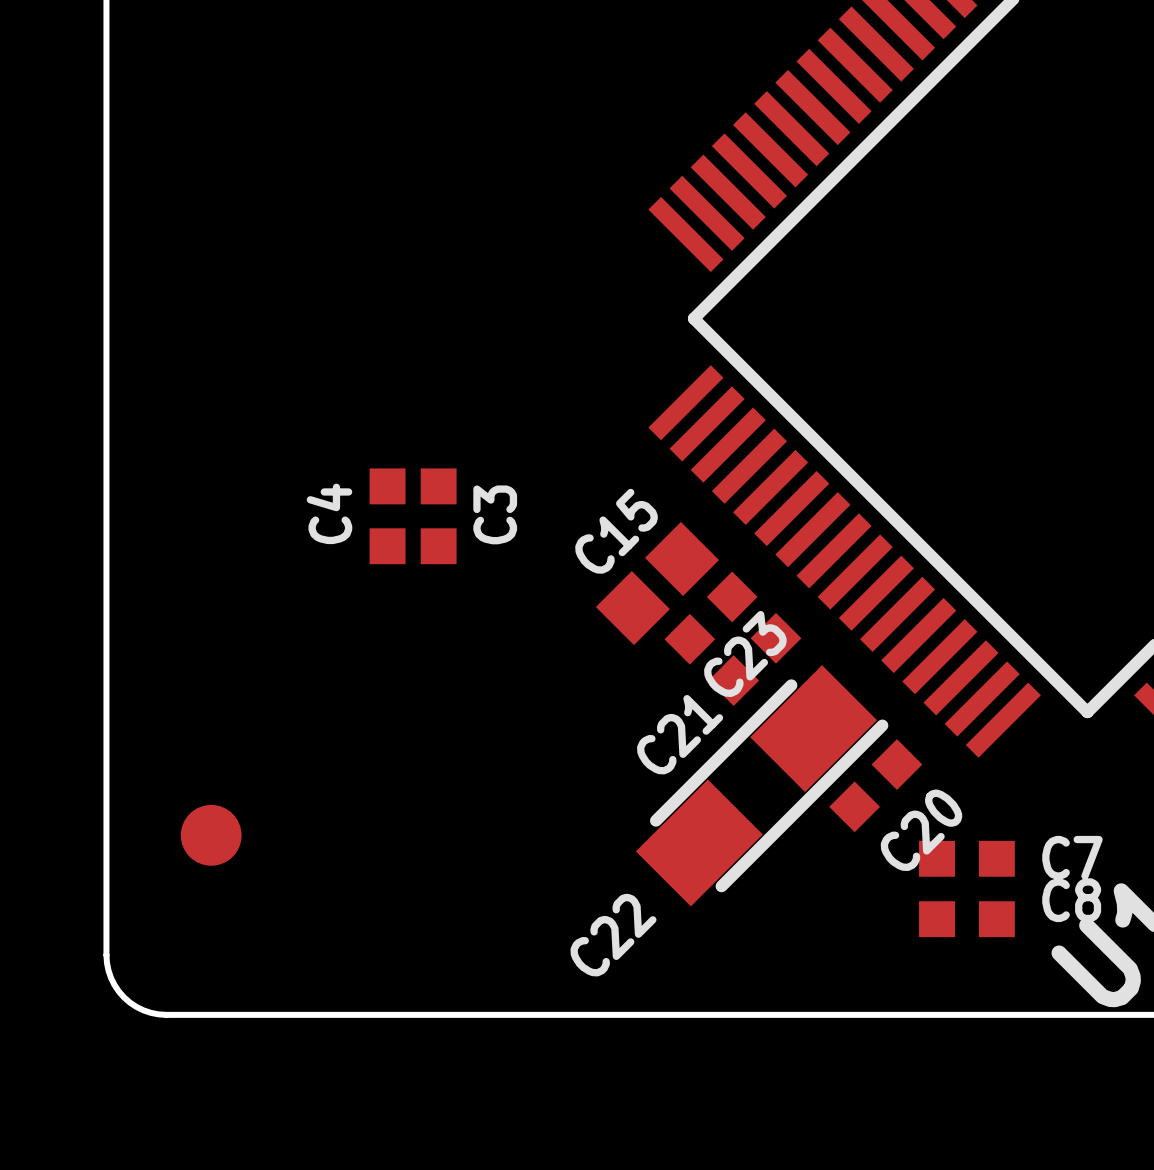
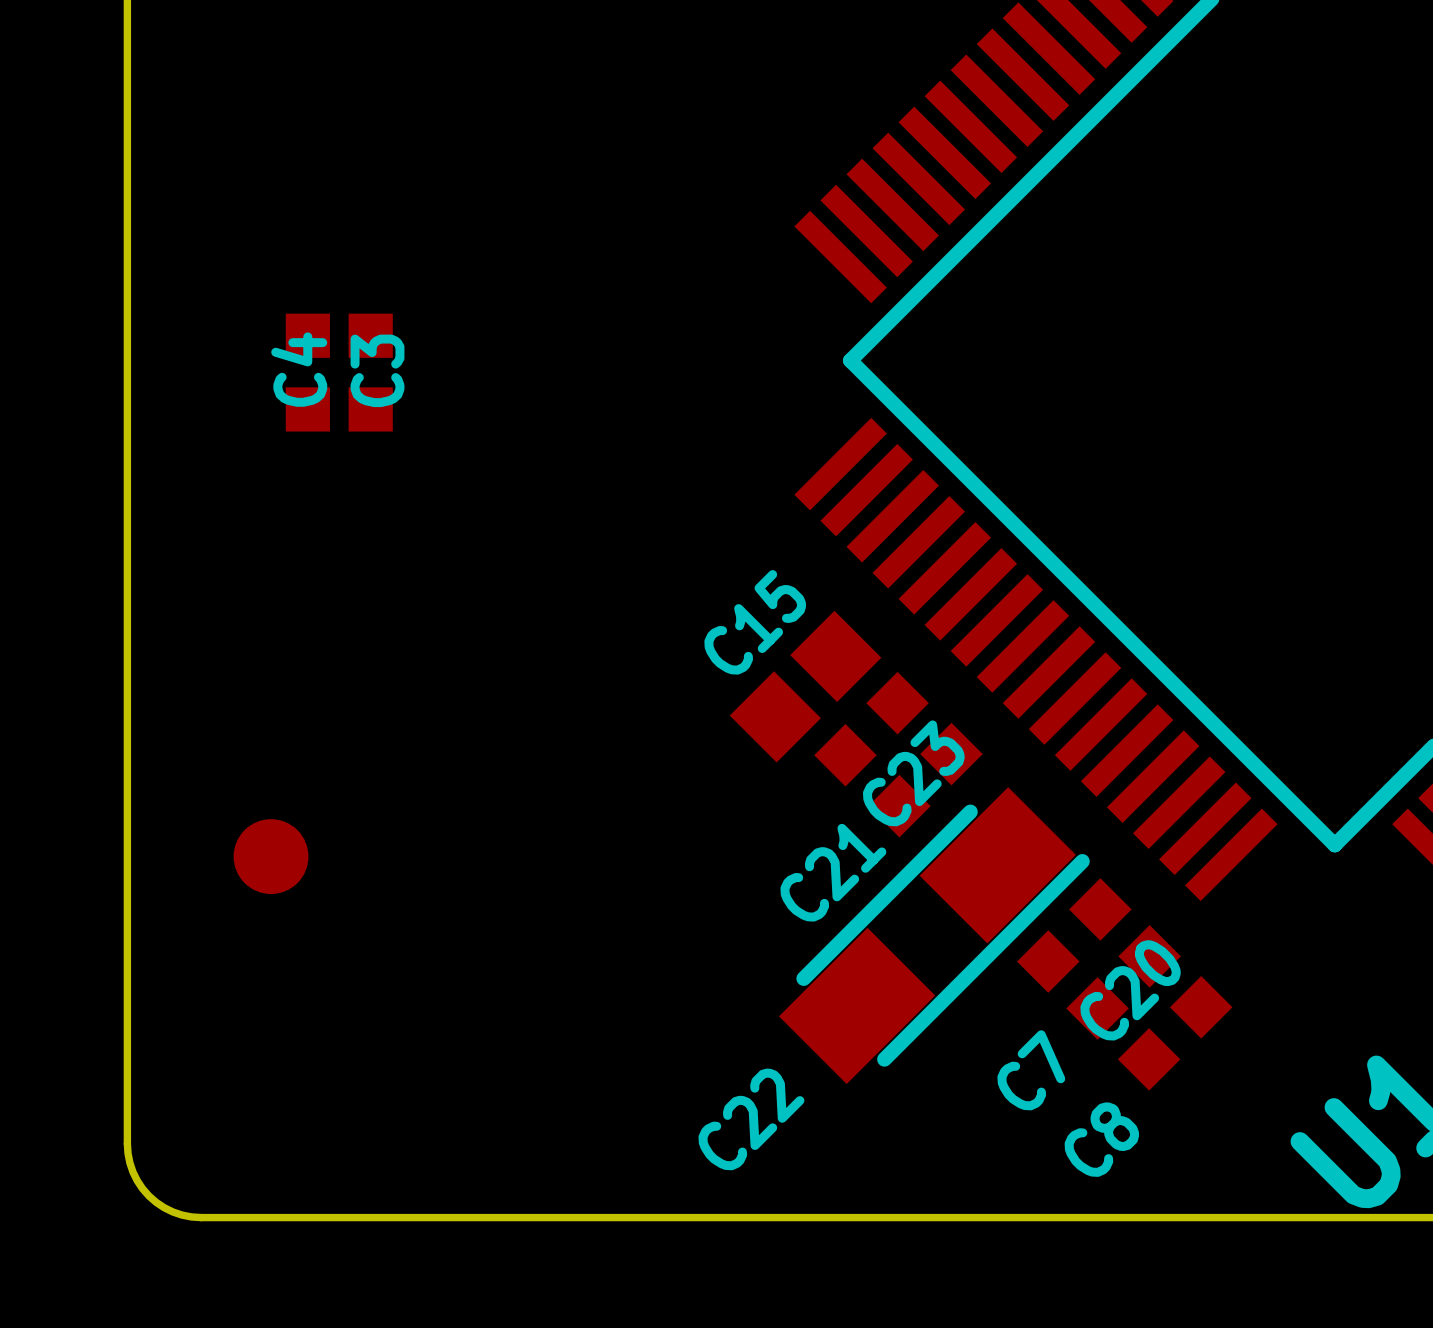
C4 position: (387, 516) -> (370, 372)
C3 position: (438, 516) -> (307, 372)
part position: (211, 835) -> (271, 856)
C7 name position: C7 (1072, 857) -> C7 (1031, 1070)
C7 rotation: 0° (966, 858) -> 45° counterclockwise (1123, 982)
C7 position: (966, 858) -> (1123, 982)
C8 name position: C8 (1071, 900) -> C8 (1101, 1139)
C8 rotation: 0° (966, 919) -> 45° counterclockwise (1175, 1033)

